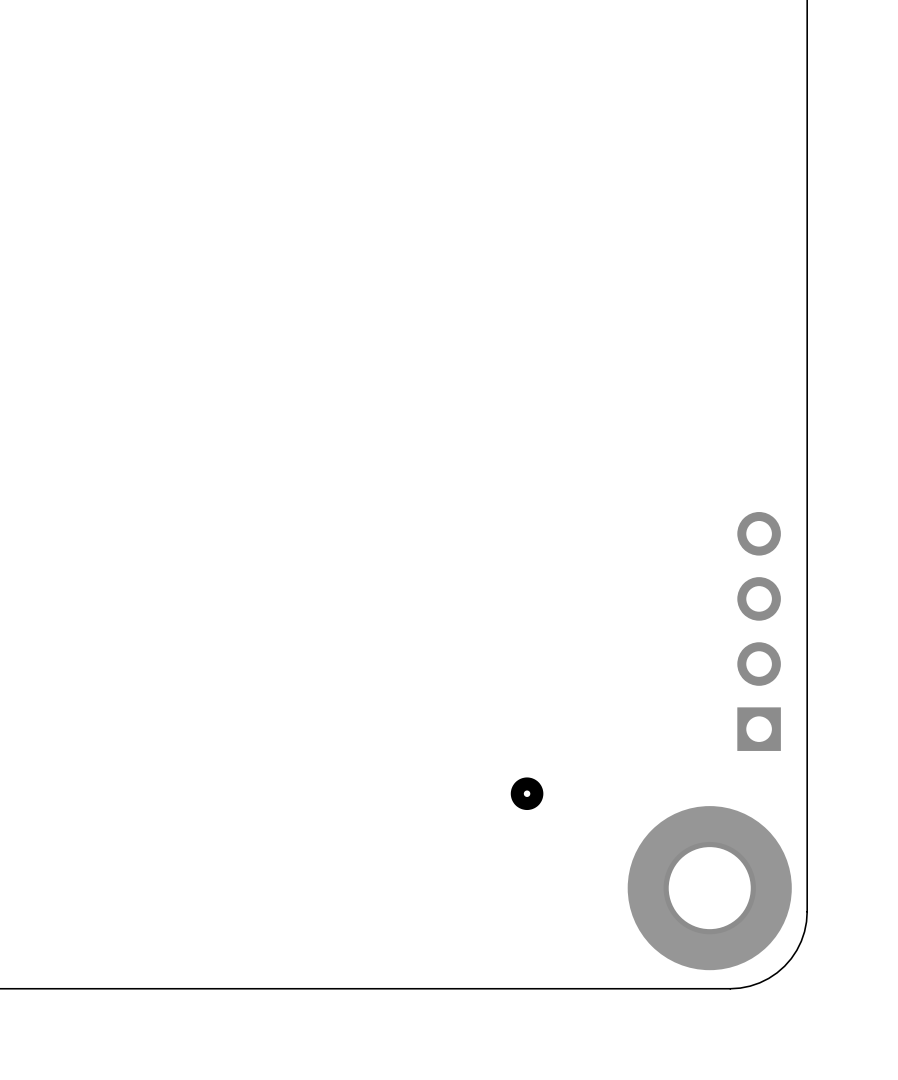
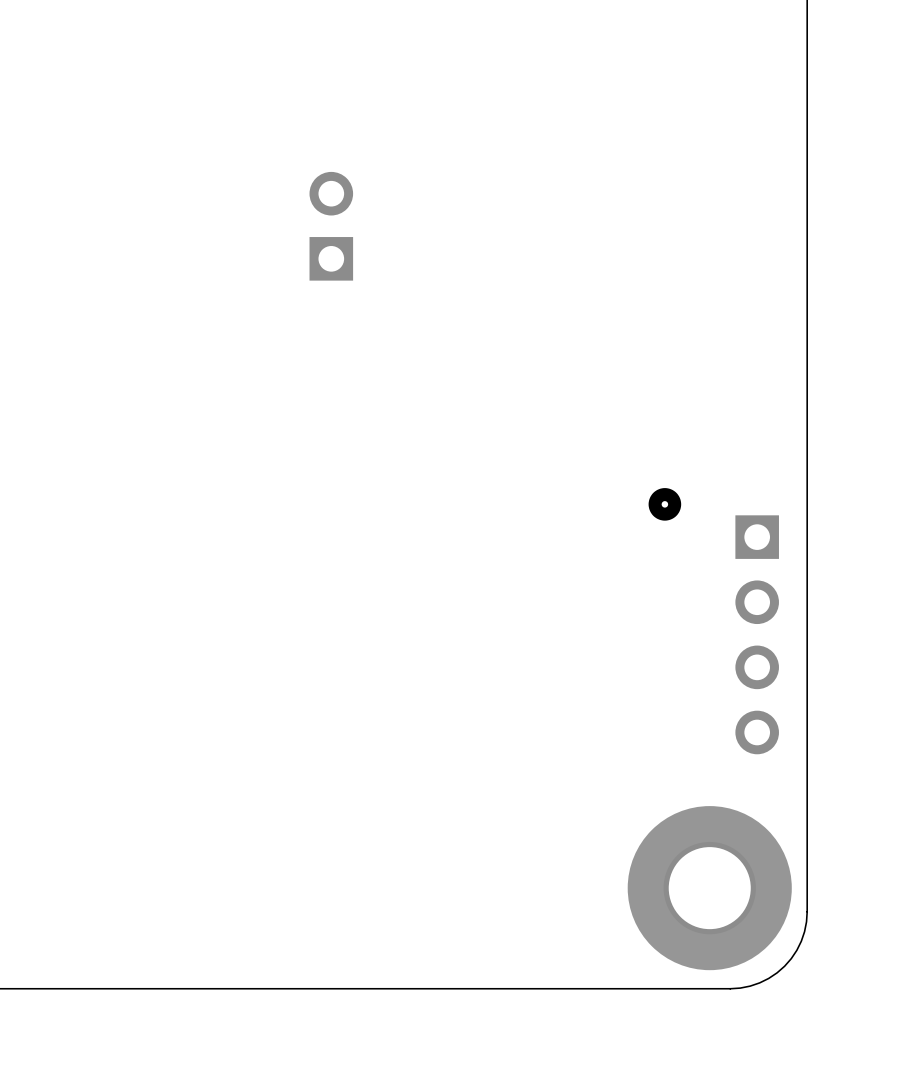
part: none -> (331, 226)
part rotation: 0° (759, 631) -> 180° (757, 634)
part position: (527, 793) -> (664, 504)

